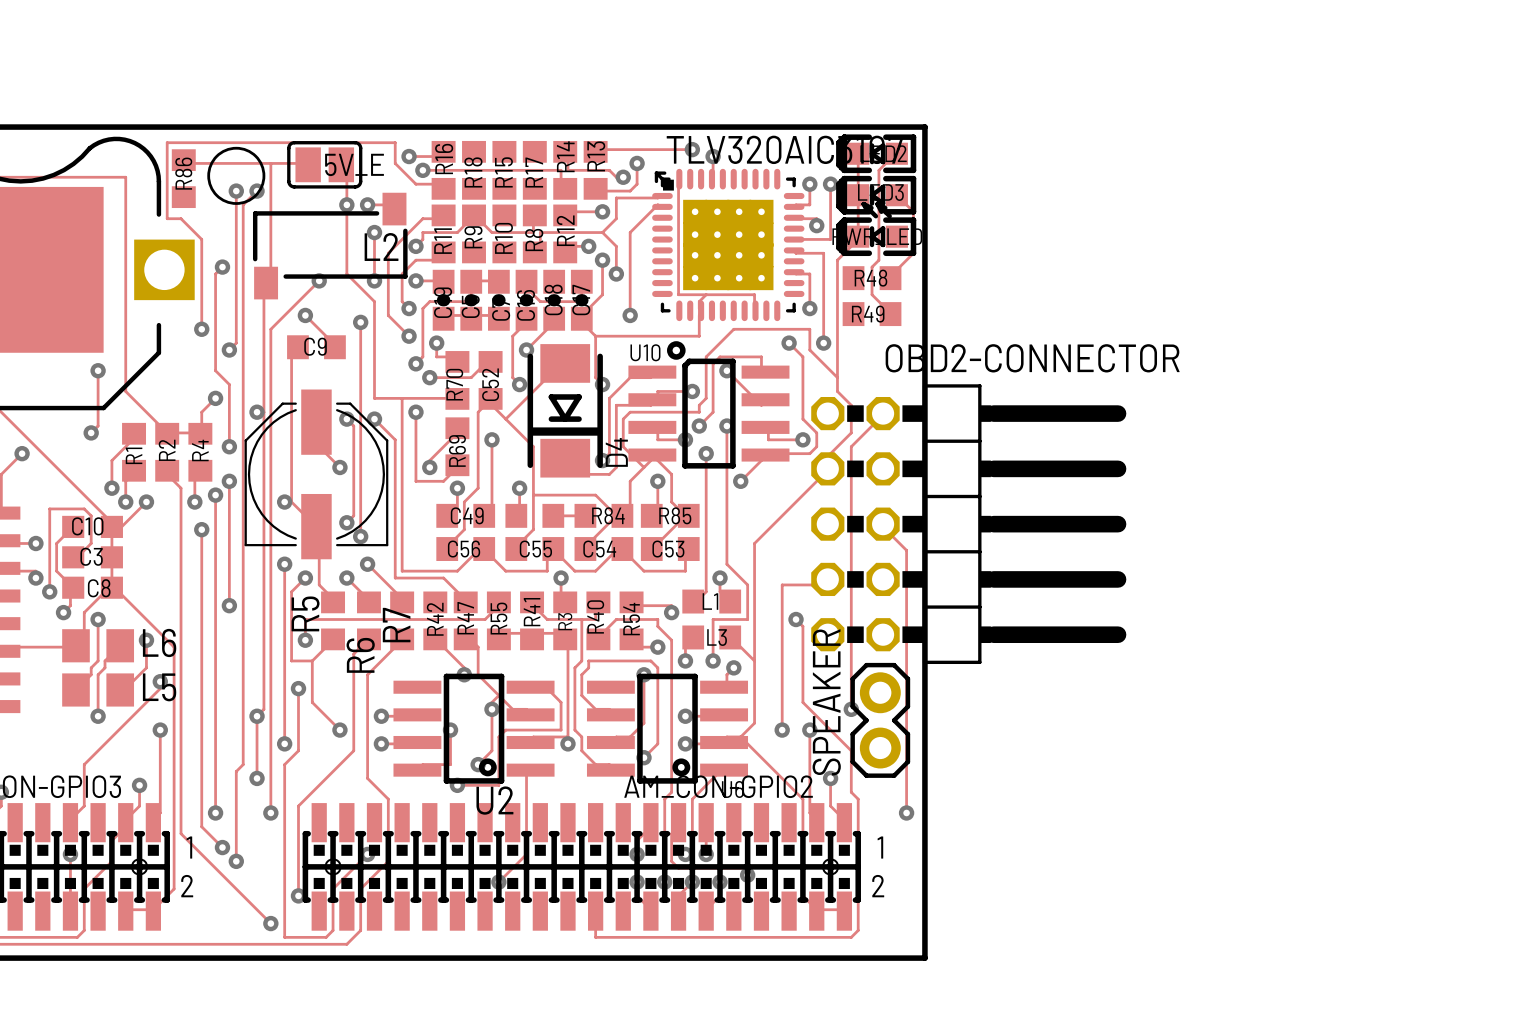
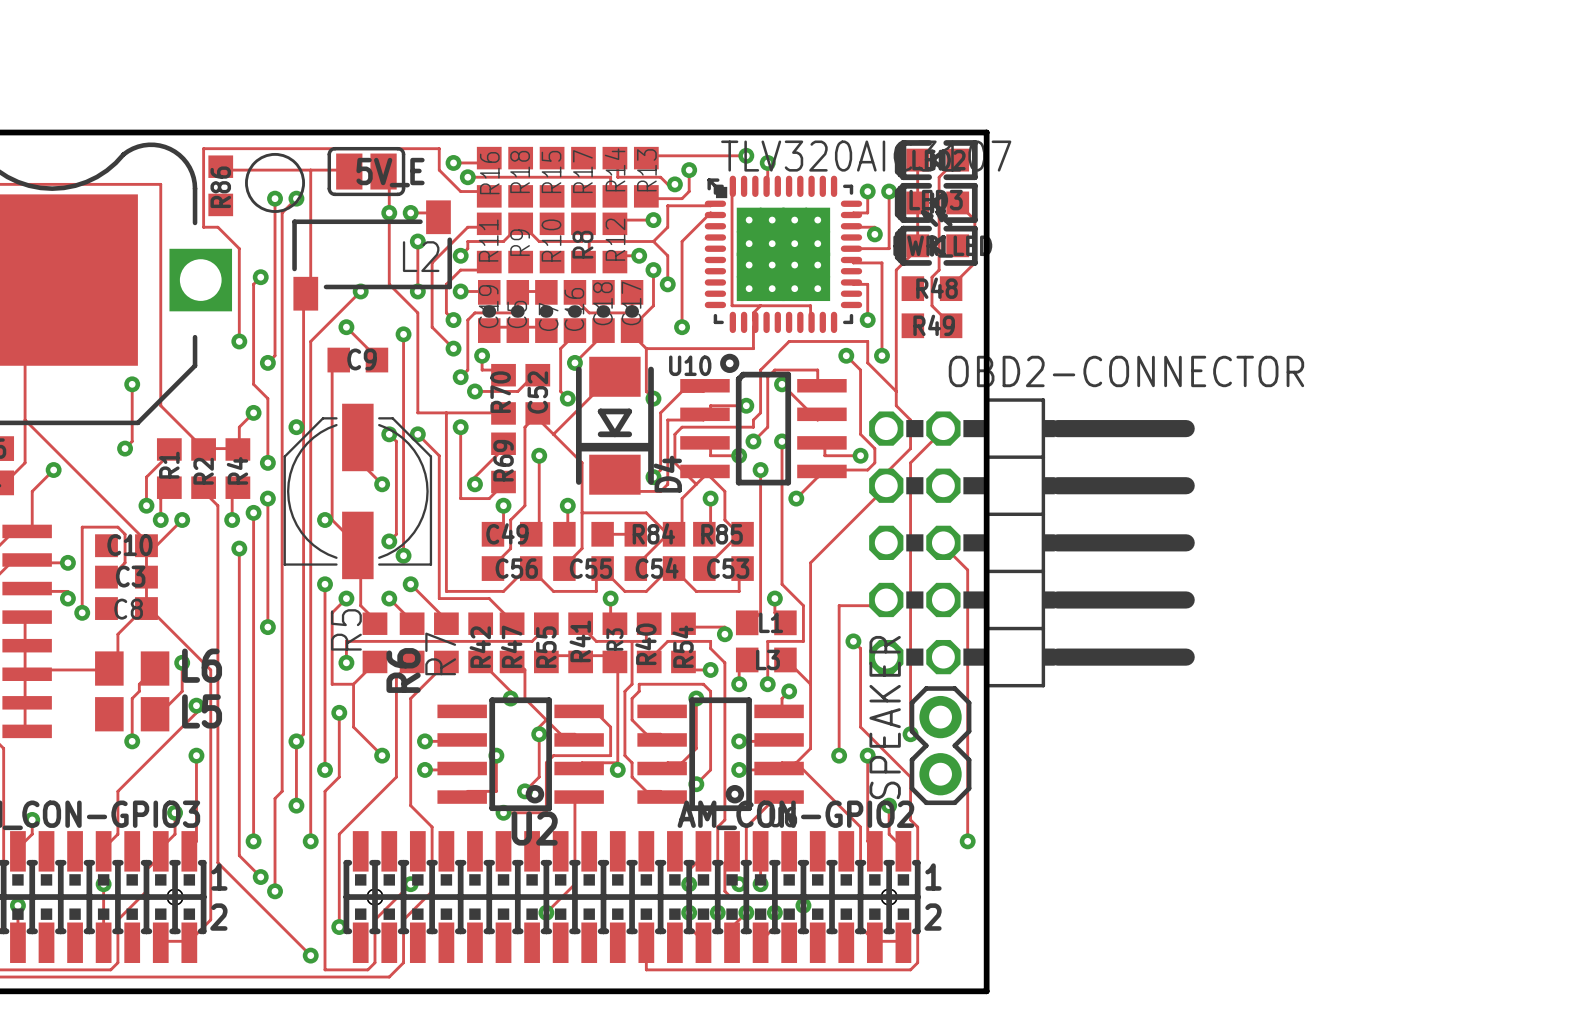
track: (73, 526) (56, 543) (56, 571) (73, 587) (70, 591) (70, 605) (63, 612) -> none
via: (63, 612) -> none
track: (98, 619) (98, 660) (91, 667) (91, 674) (75, 689) -> none
via: (98, 619) -> none

